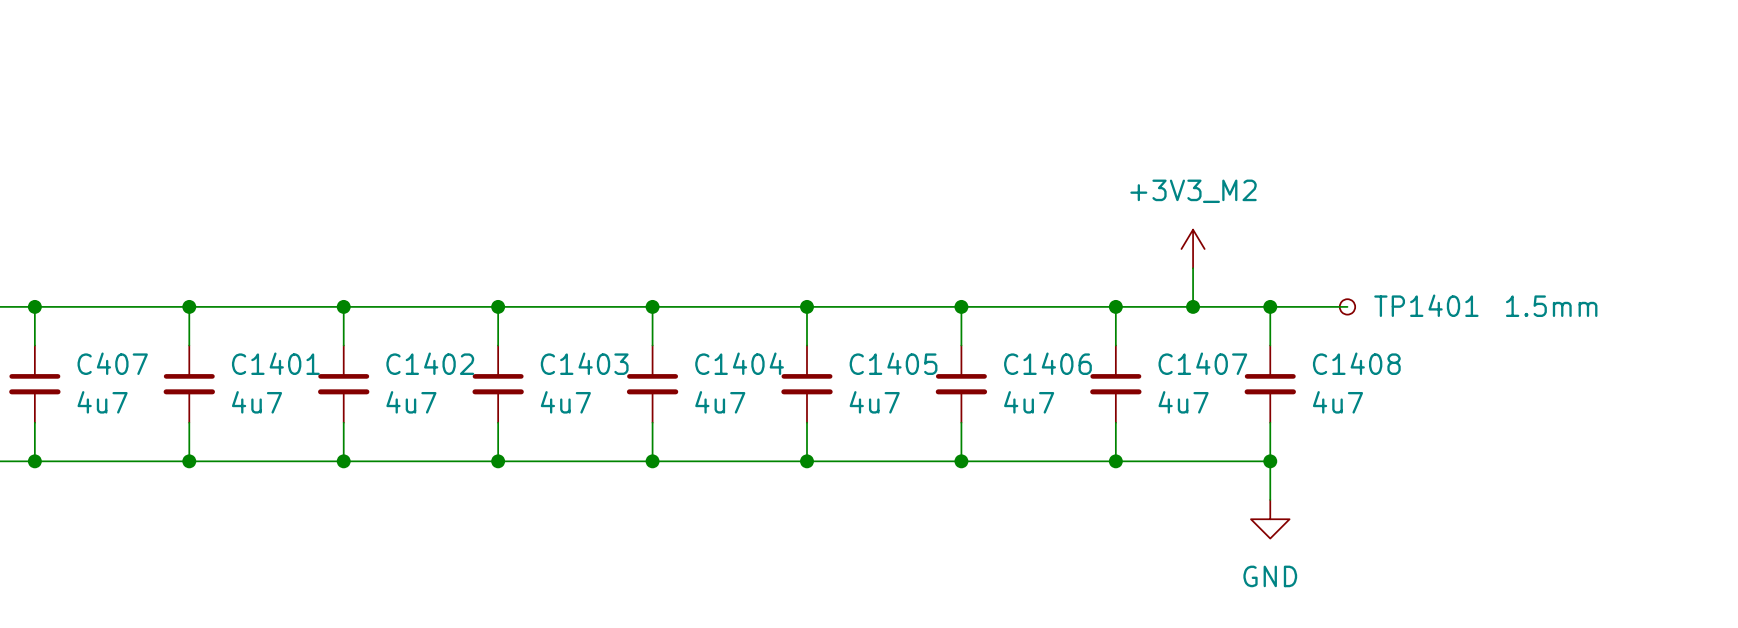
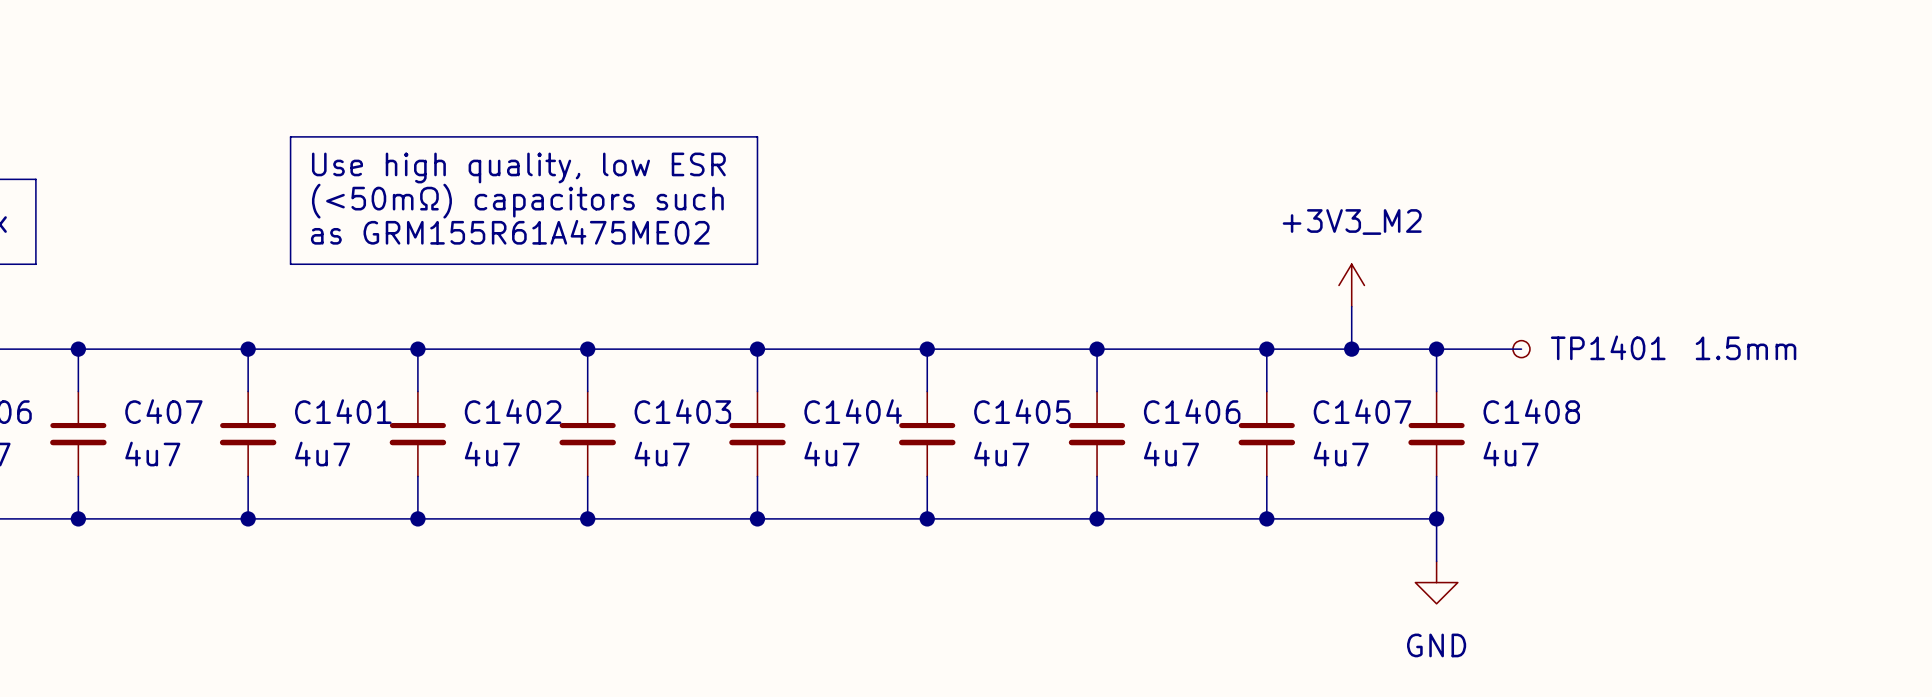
line: none -> (290, 136) (757, 136) (757, 264) (290, 264) (290, 136)
text: none -> Use high quality, low ESR (518, 167)
text: none -> (<50mΩ) capacitors such (517, 201)
text: none -> as GRM155R61A475ME02 (510, 232)

